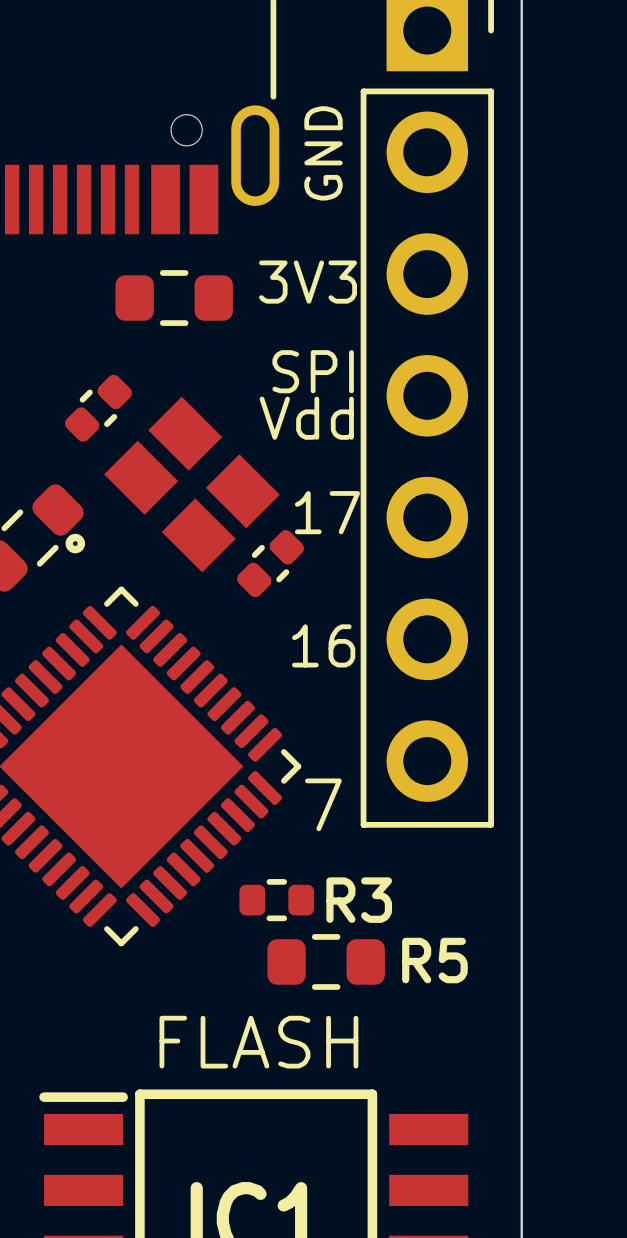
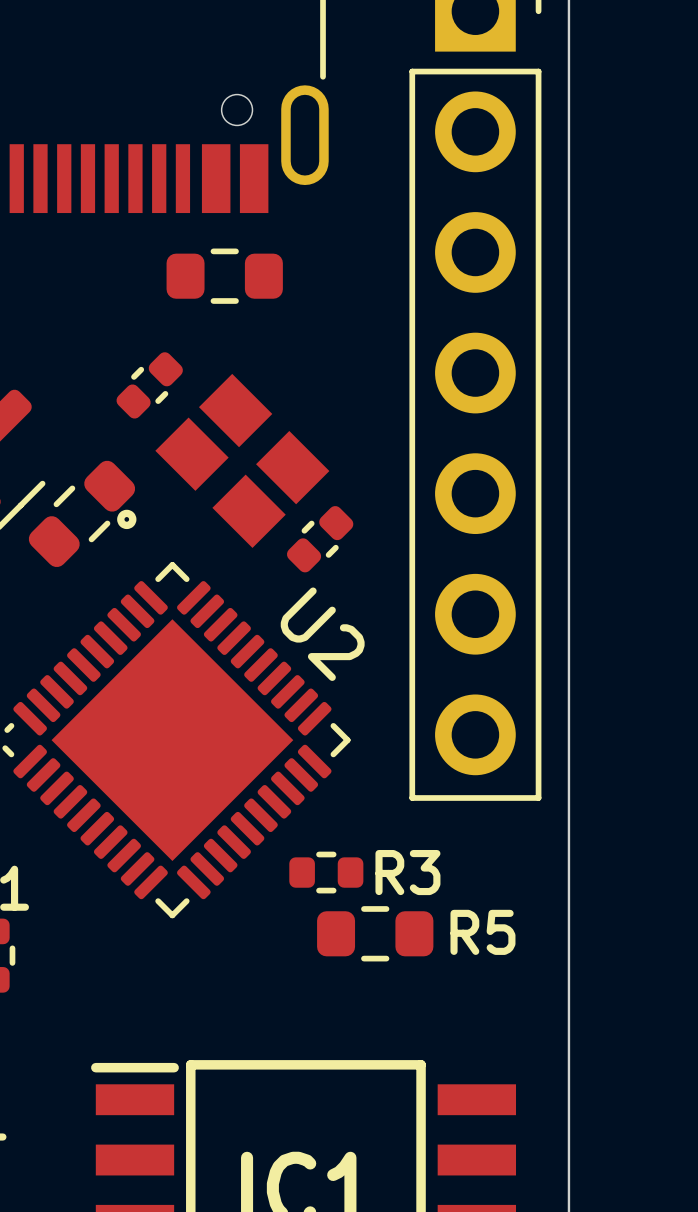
text: GND (323, 153) -> none
text: 3V3 (308, 282) -> none
text: SPI (313, 371) -> none
text: Vdd (306, 418) -> none
text: 17 (327, 512) -> none
text: 16 (323, 645) -> none
U2 name: none -> U2 (322, 634)
text: 7 (323, 804) -> none
text: FLASH (258, 1042) -> none

